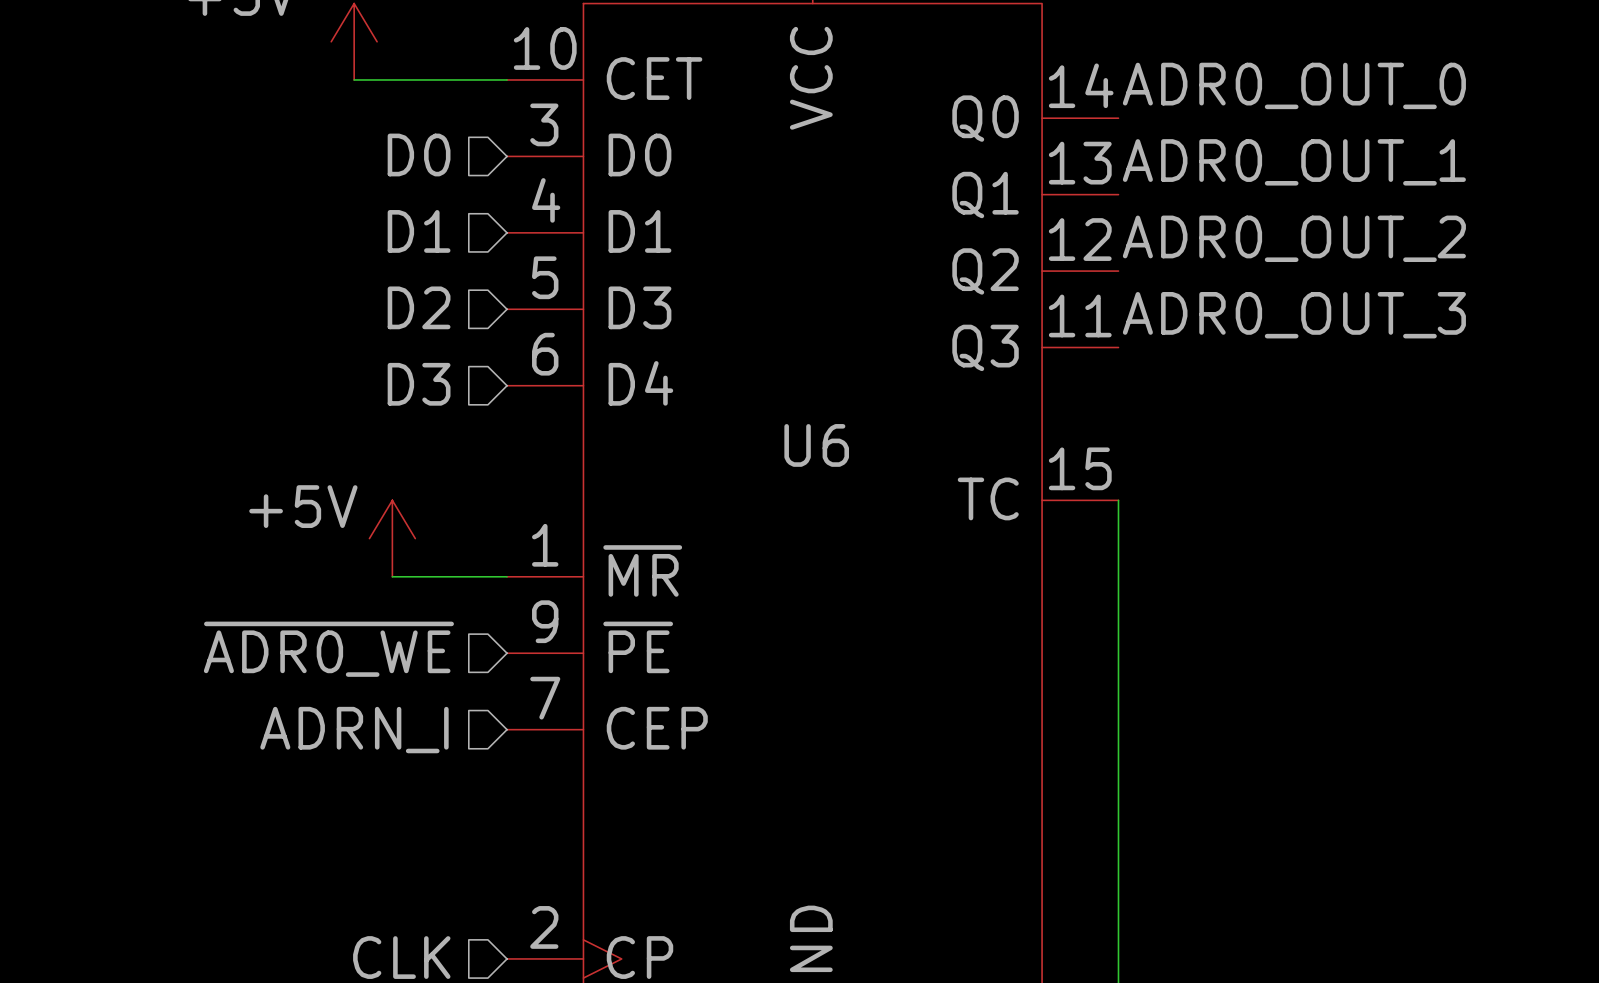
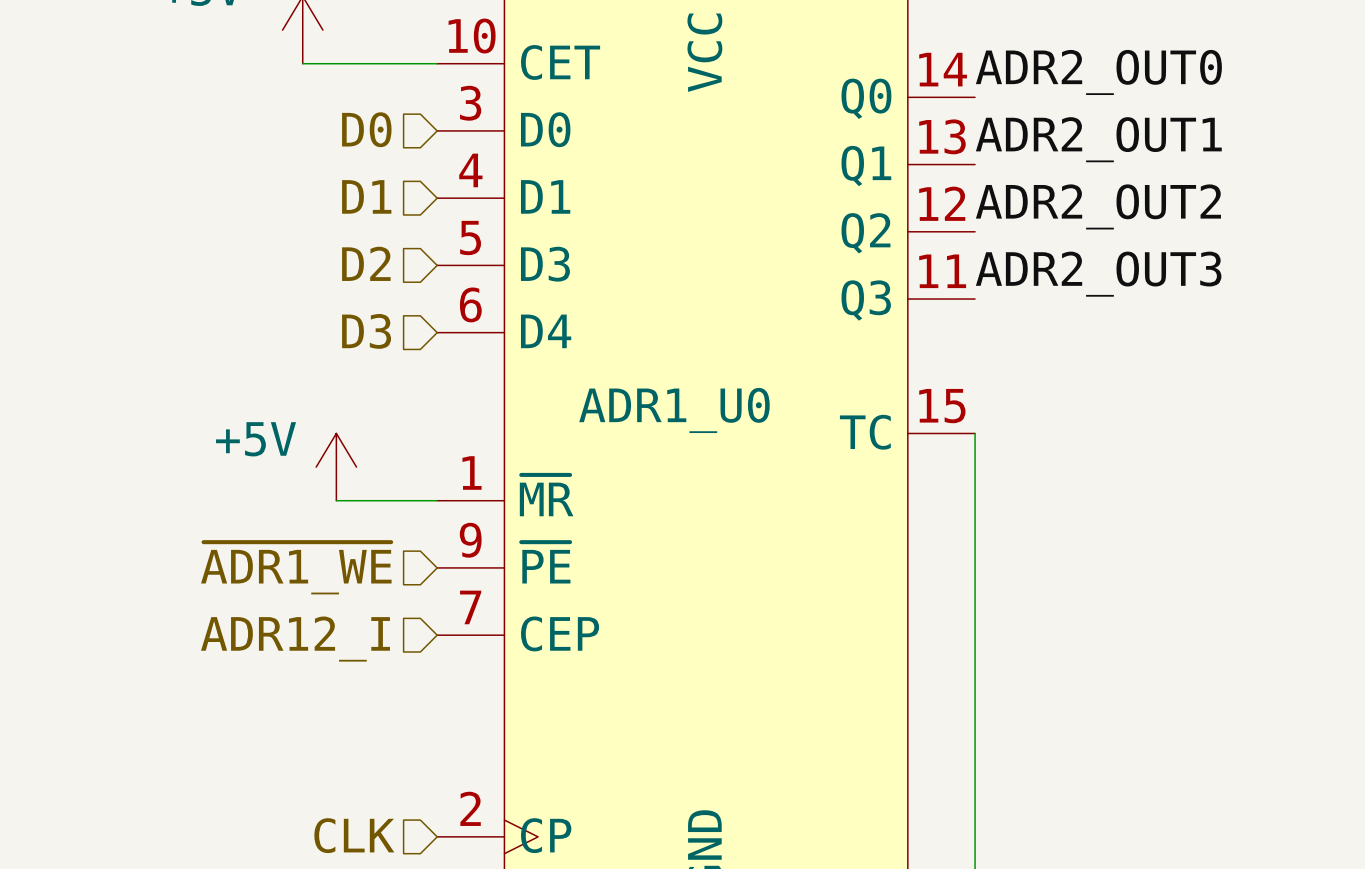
label: ADR0_OUT_0 (1294, 85) -> ADR2_OUT0 (1098, 72)
label: ADR0_OUT_1 (1294, 162) -> ADR2_OUT1 (1098, 139)
label: ADR0_OUT_2 (1294, 238) -> ADR2_OUT2 (1098, 206)
label: ADR0_OUT_3 (1294, 315) -> ADR2_OUT3 (1098, 274)
U6 name: U6 (816, 445) -> ADR1_U0 (674, 410)
hierarchical label: ~{ADR0_WE} (328, 649) -> ~{ADR1_WE} (296, 568)
hierarchical label: ADRN_I (354, 730) -> ADR12_I (295, 639)

